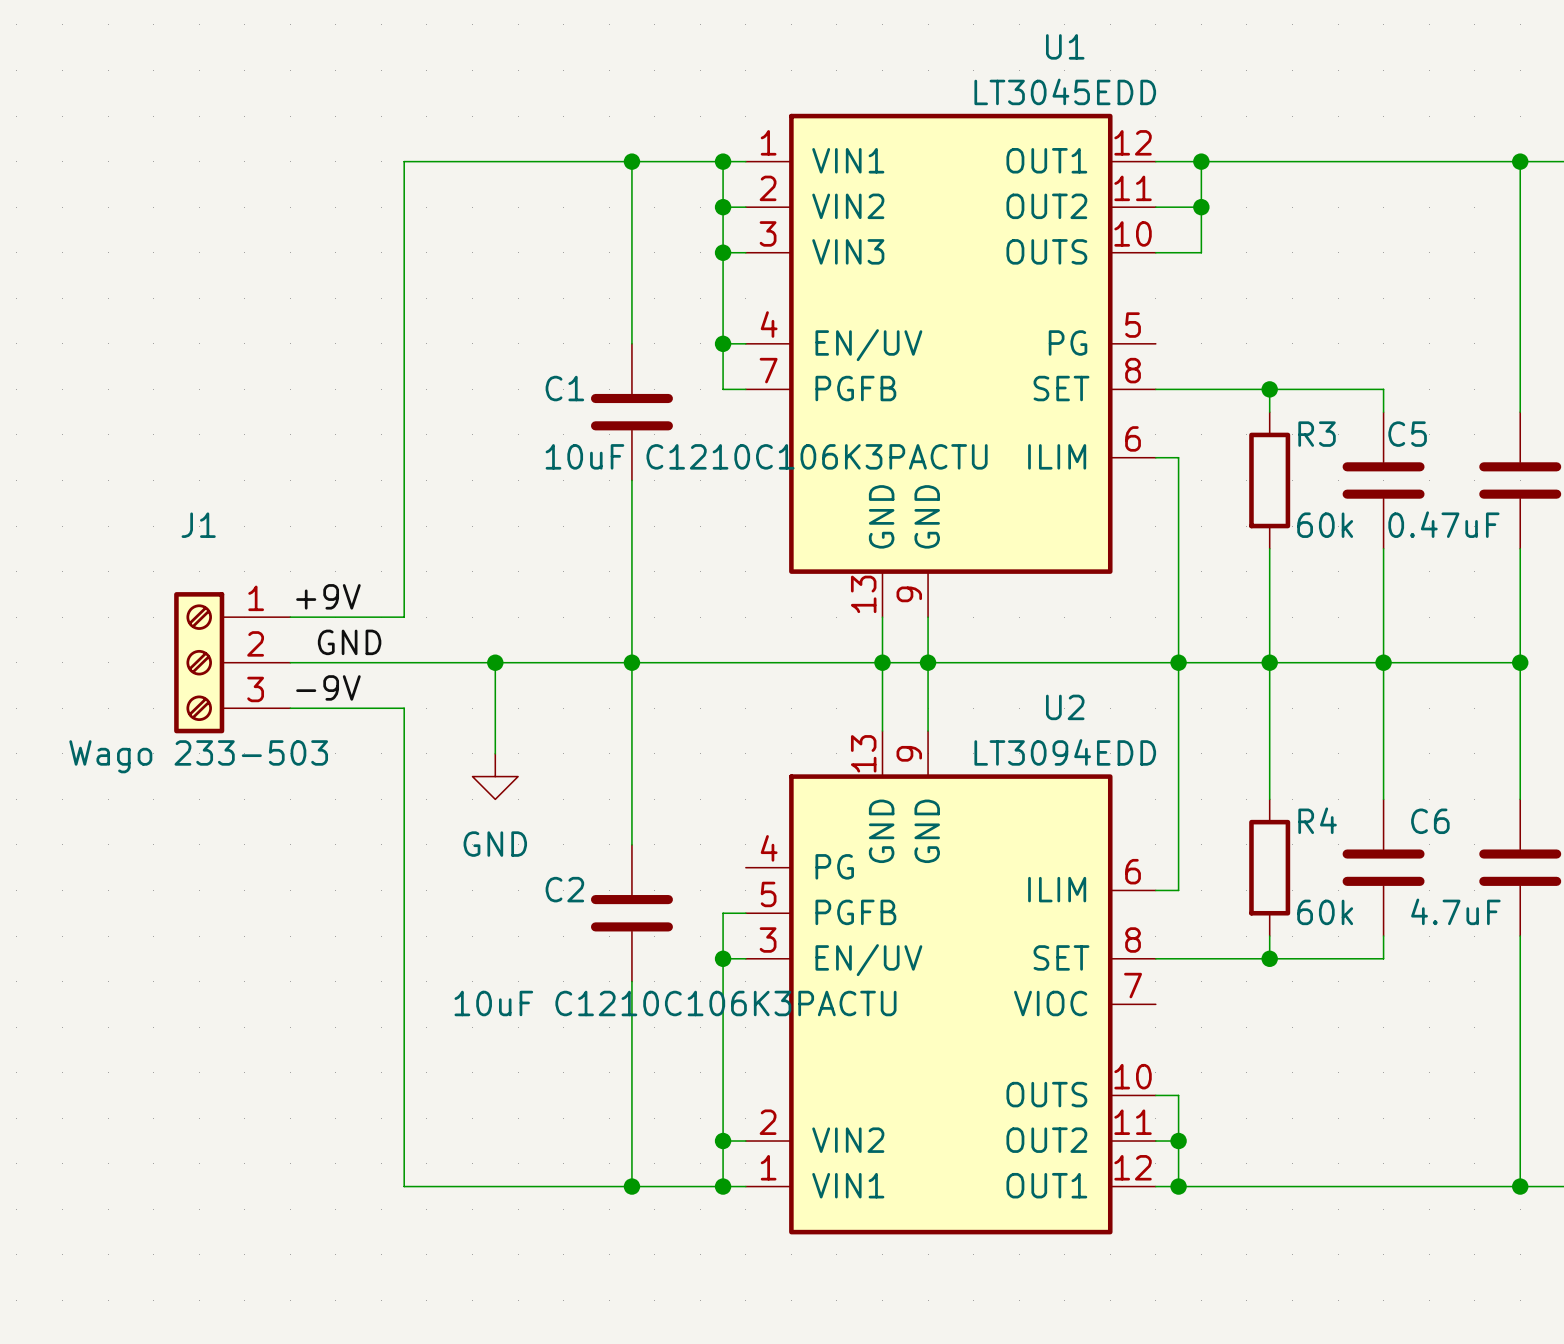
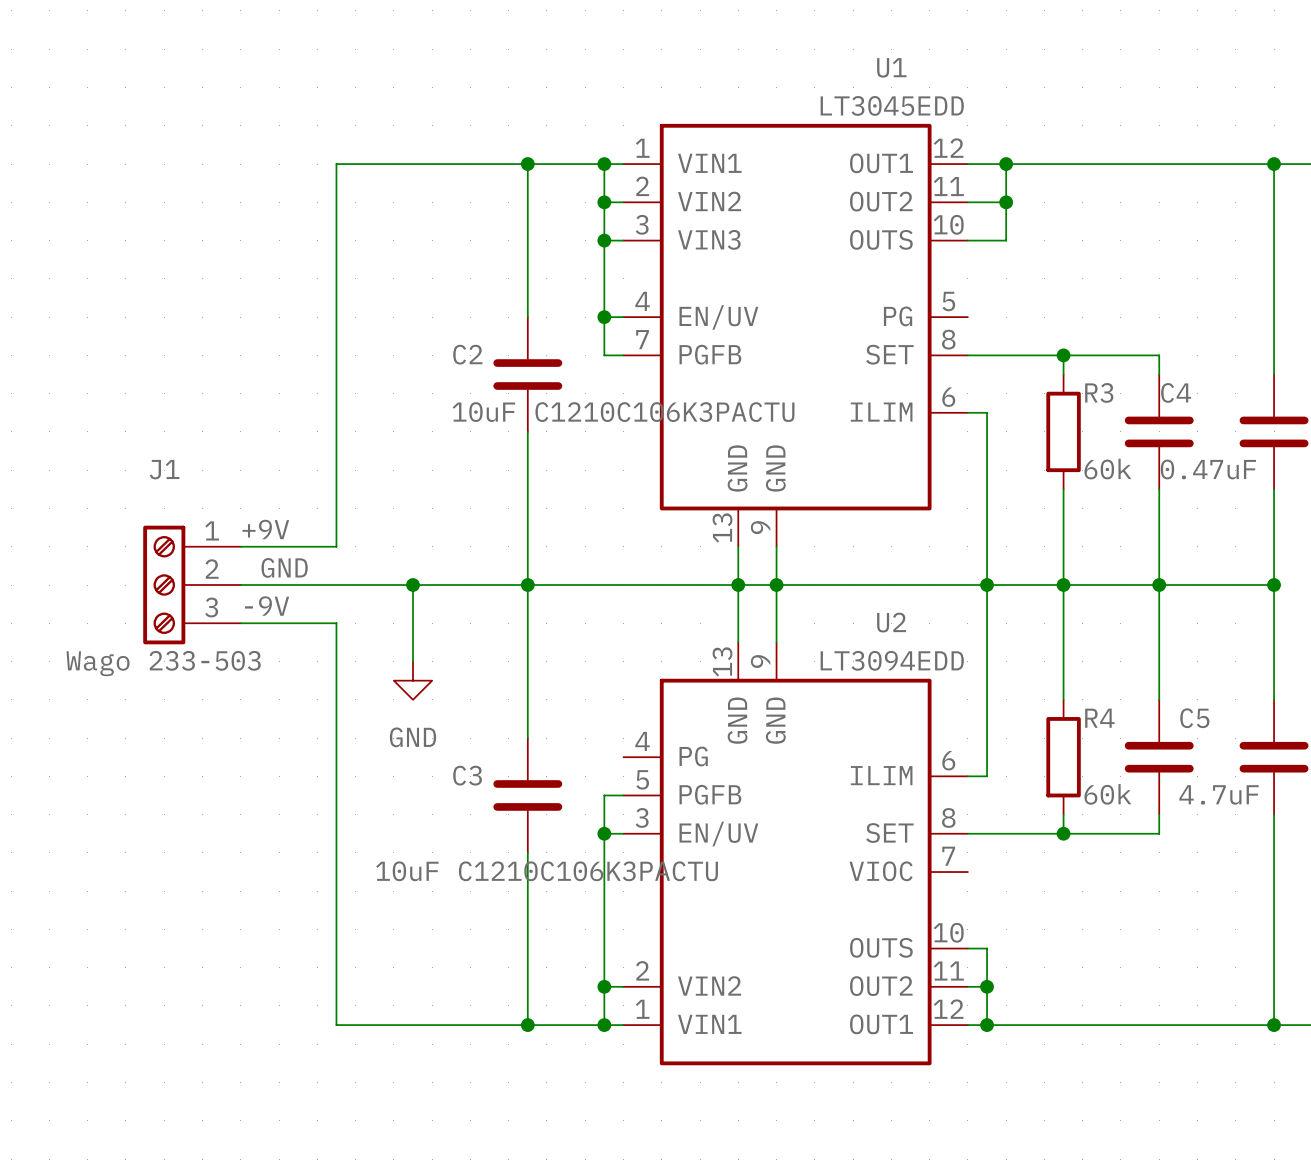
C1 name: C1 (564, 388) -> C2 (467, 354)
C5 name: C5 (1407, 434) -> C4 (1176, 392)
C6 name: C6 (1430, 821) -> C5 (1194, 718)
C2 name: C2 (564, 889) -> C3 (467, 775)

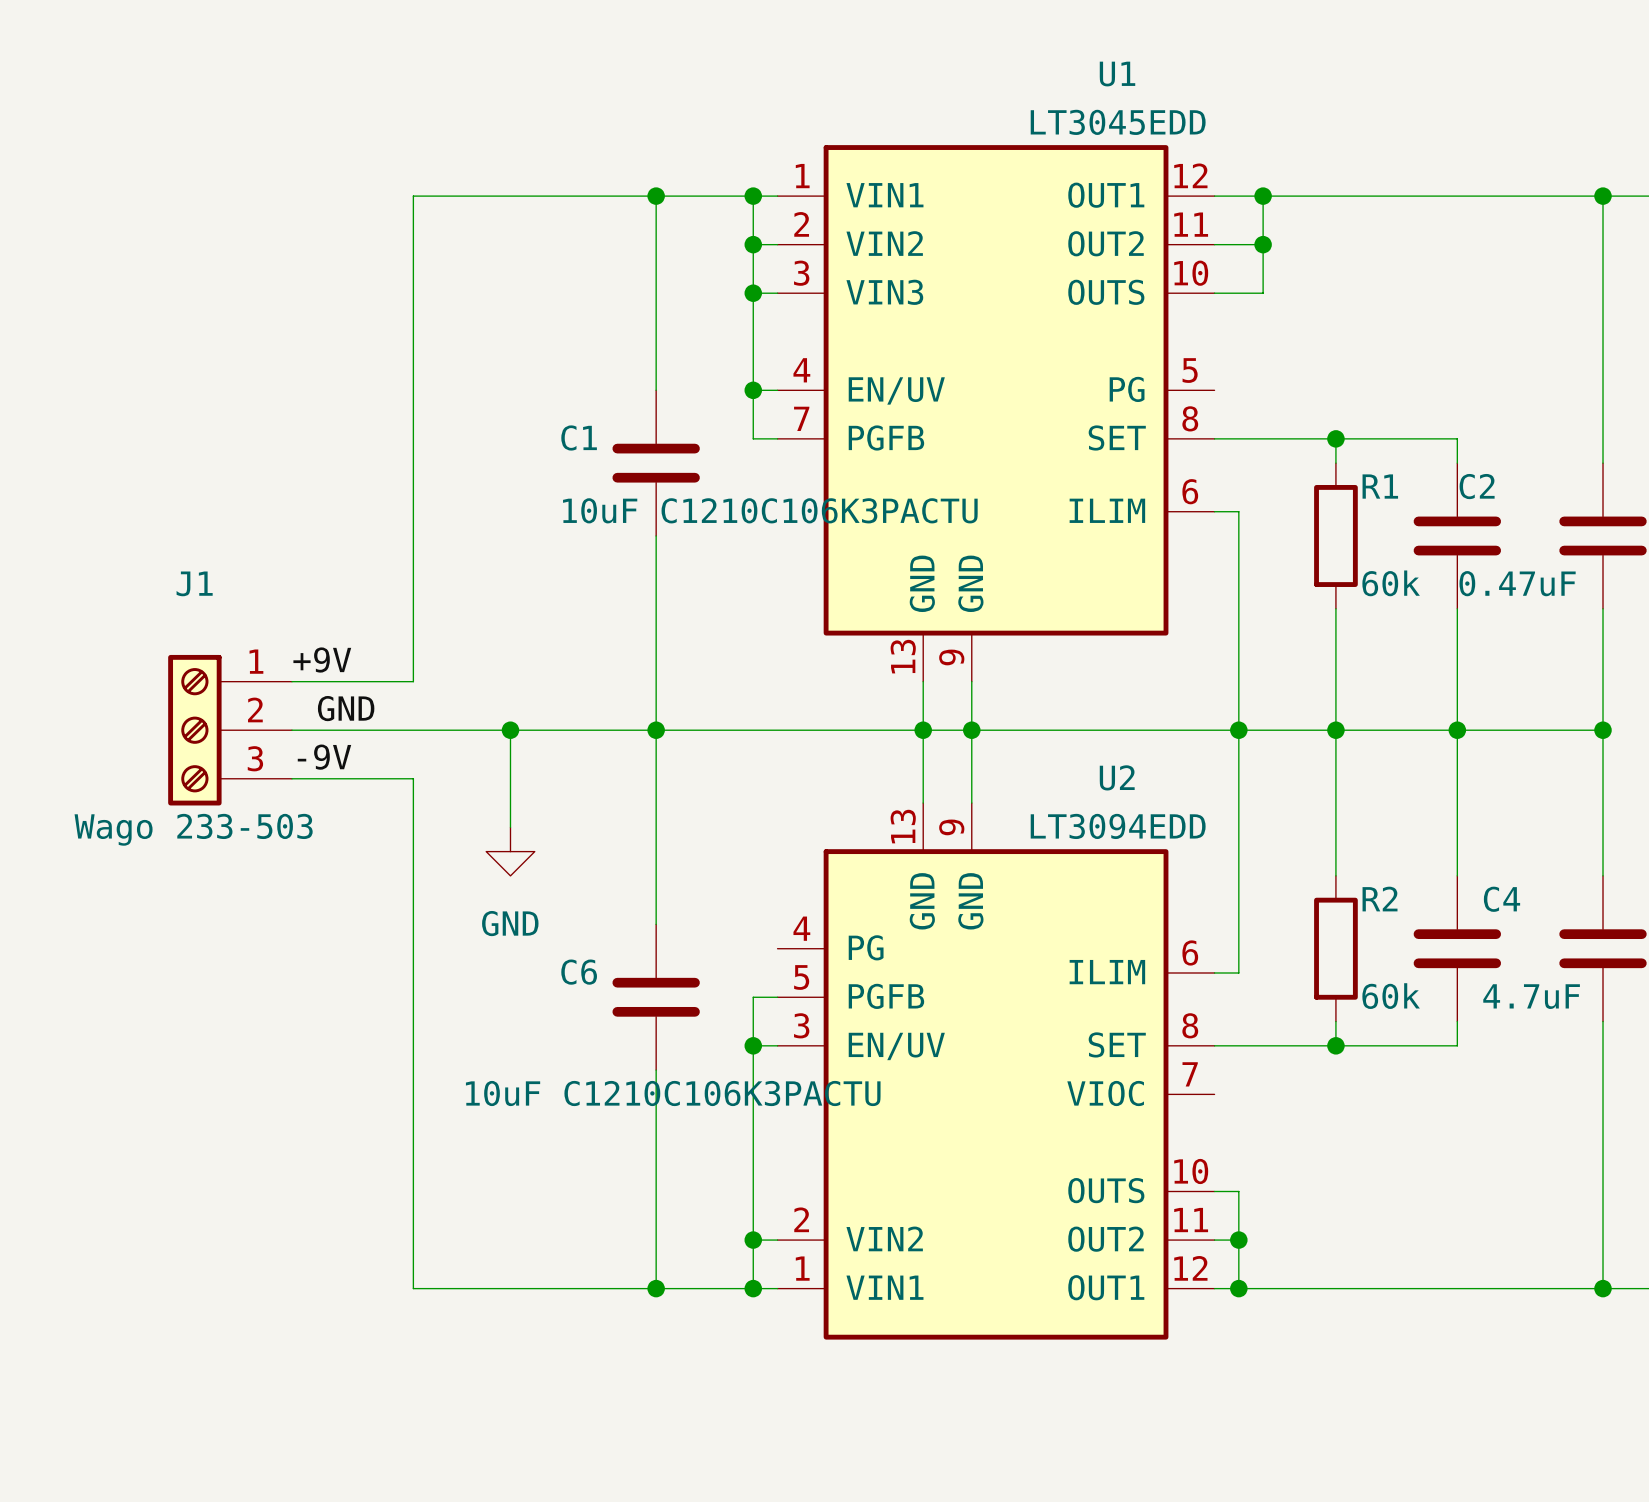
C2 name: C2 (467, 354) -> C1 (579, 437)
R3 name: R3 (1099, 392) -> R1 (1380, 486)
C4 name: C4 (1176, 392) -> C2 (1477, 486)
R4 name: R4 (1099, 718) -> R2 (1380, 899)
C5 name: C5 (1194, 718) -> C4 (1501, 899)
C3 name: C3 (467, 775) -> C6 (579, 972)

